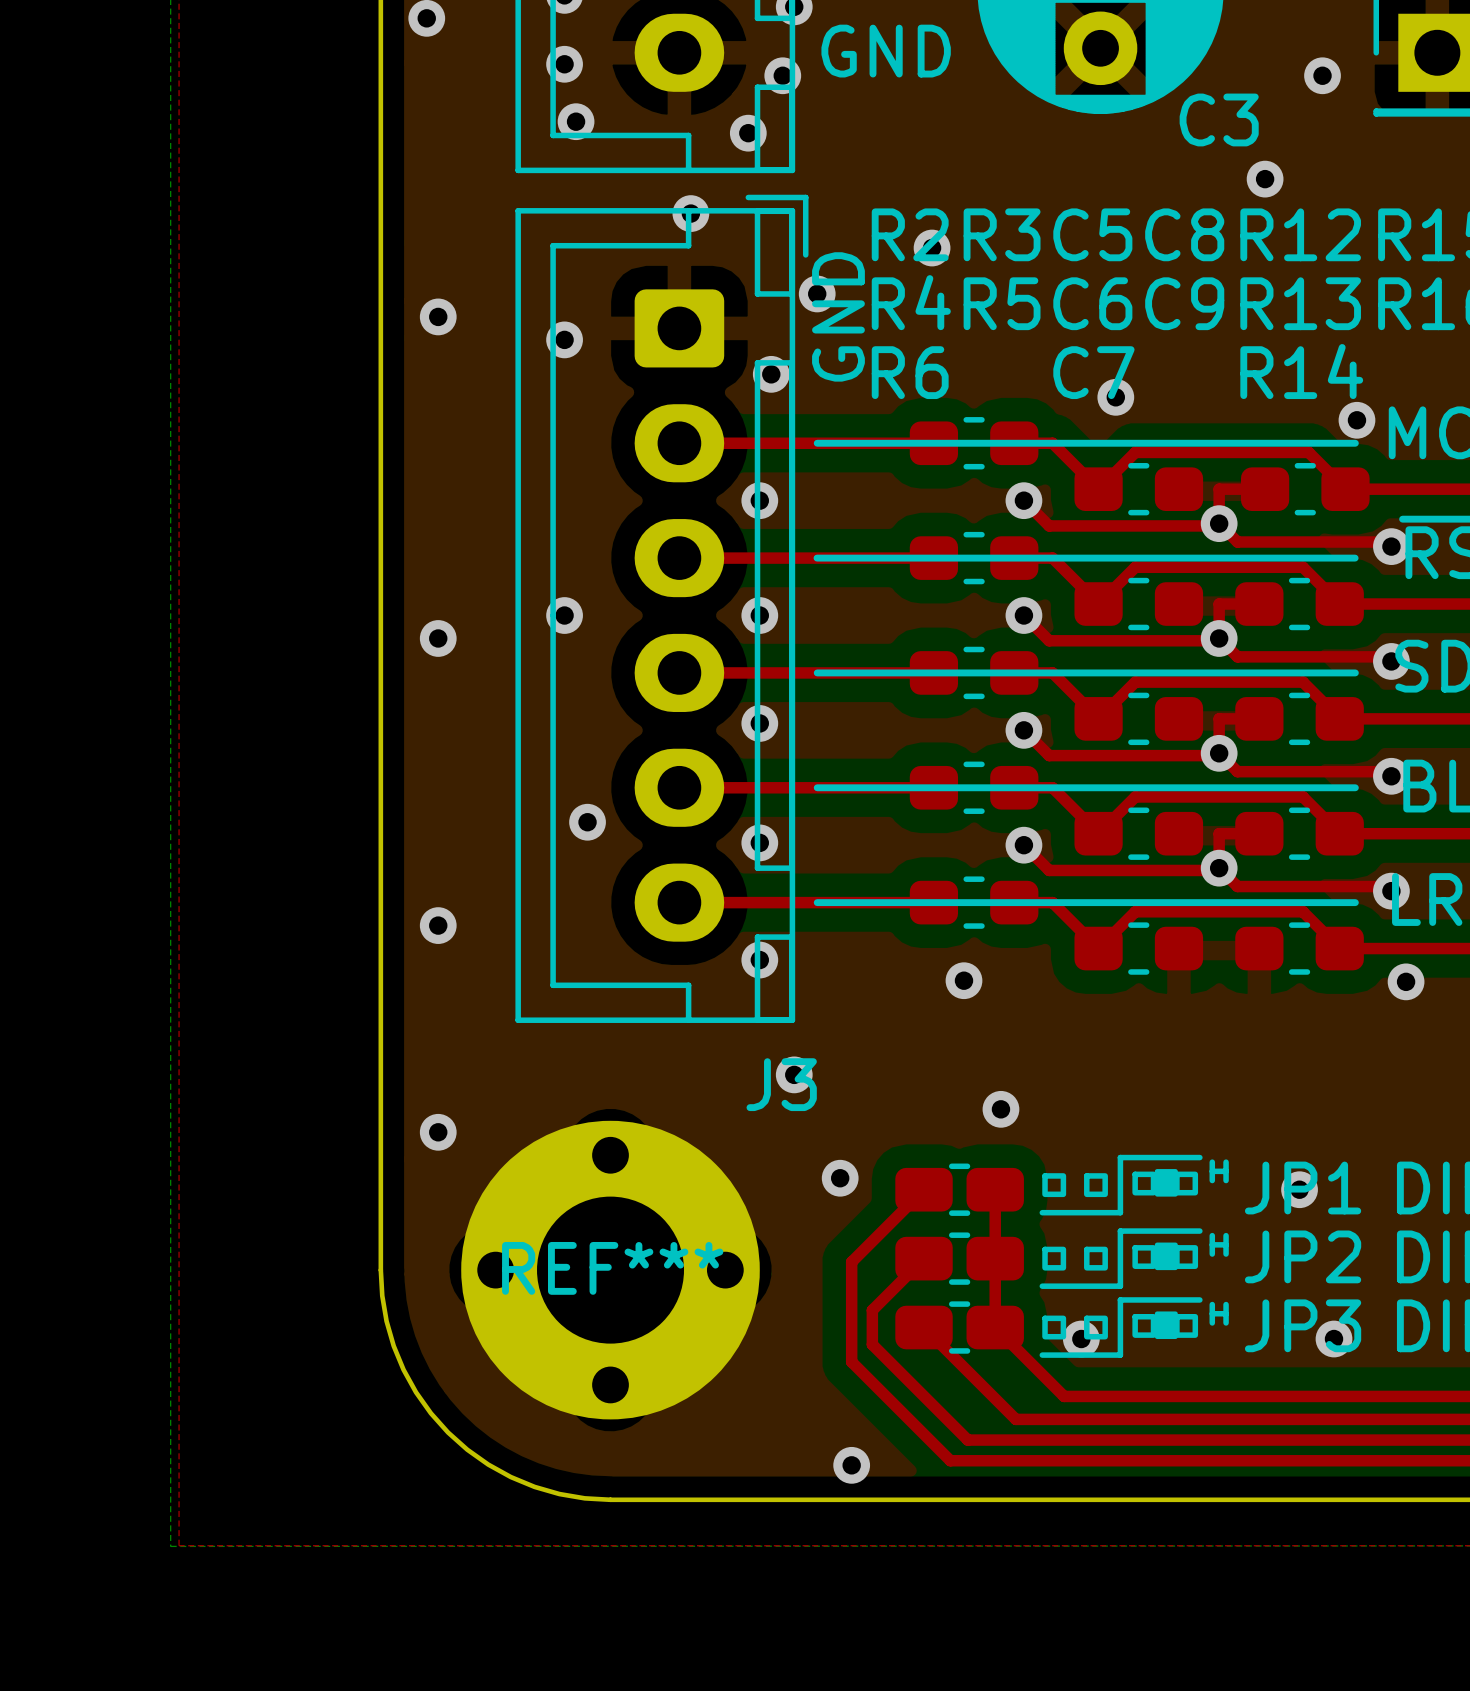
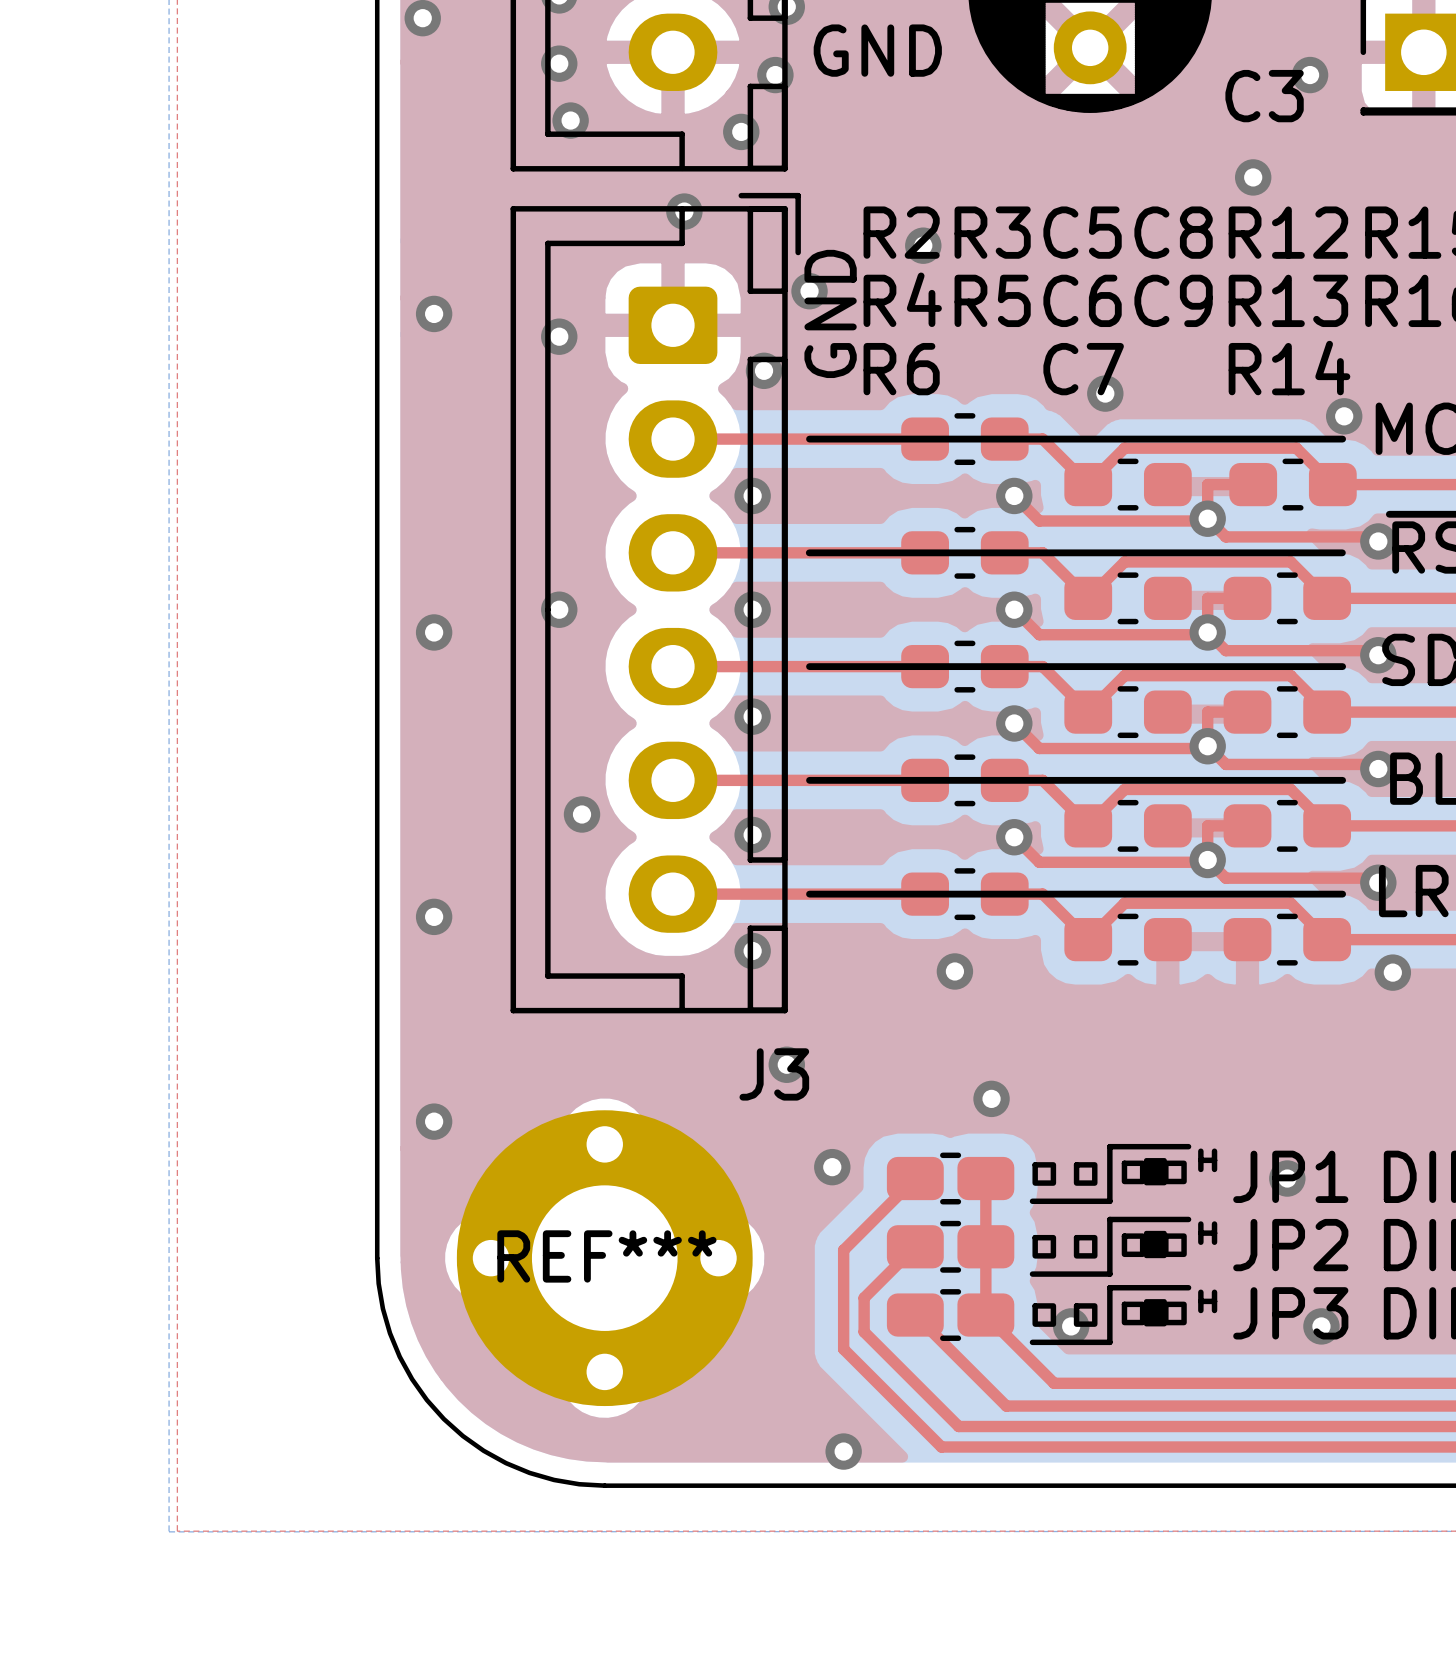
C3 name position: C3 (1219, 119) -> C3 (1264, 96)

